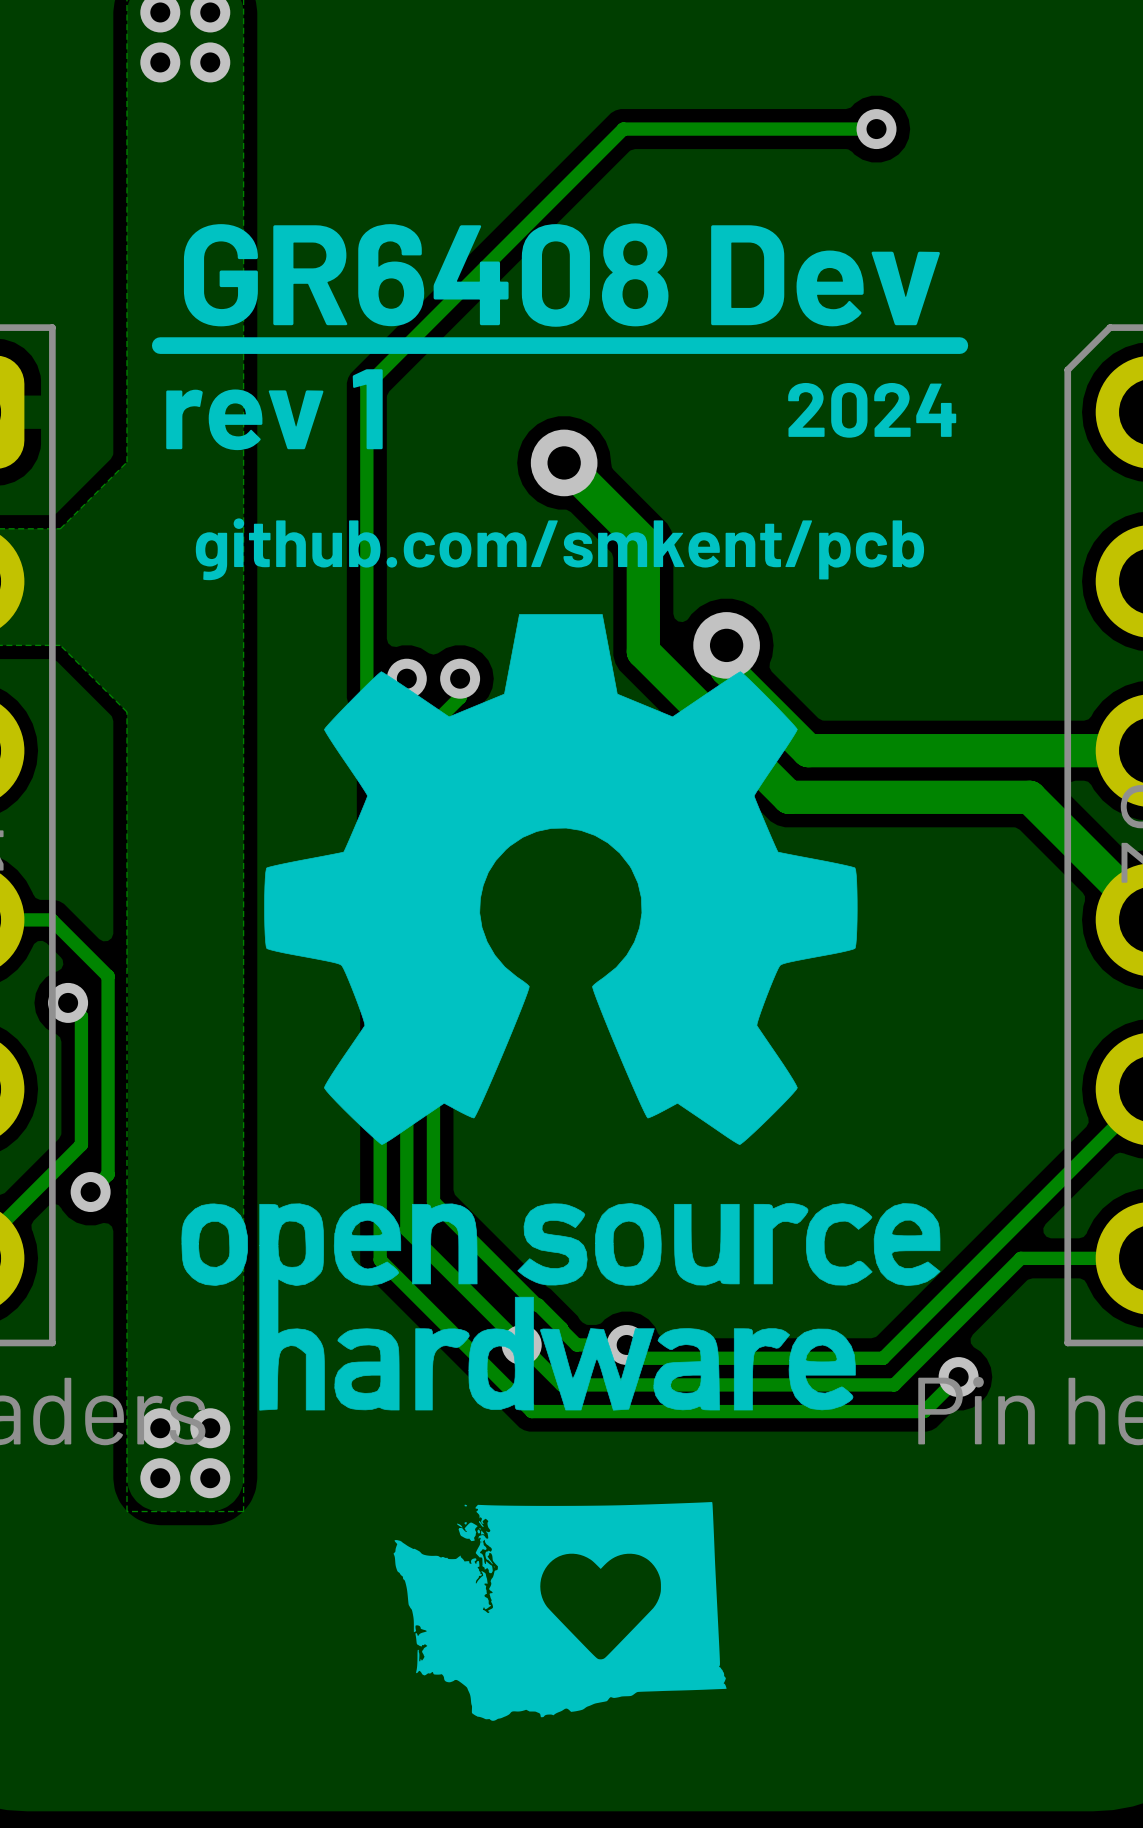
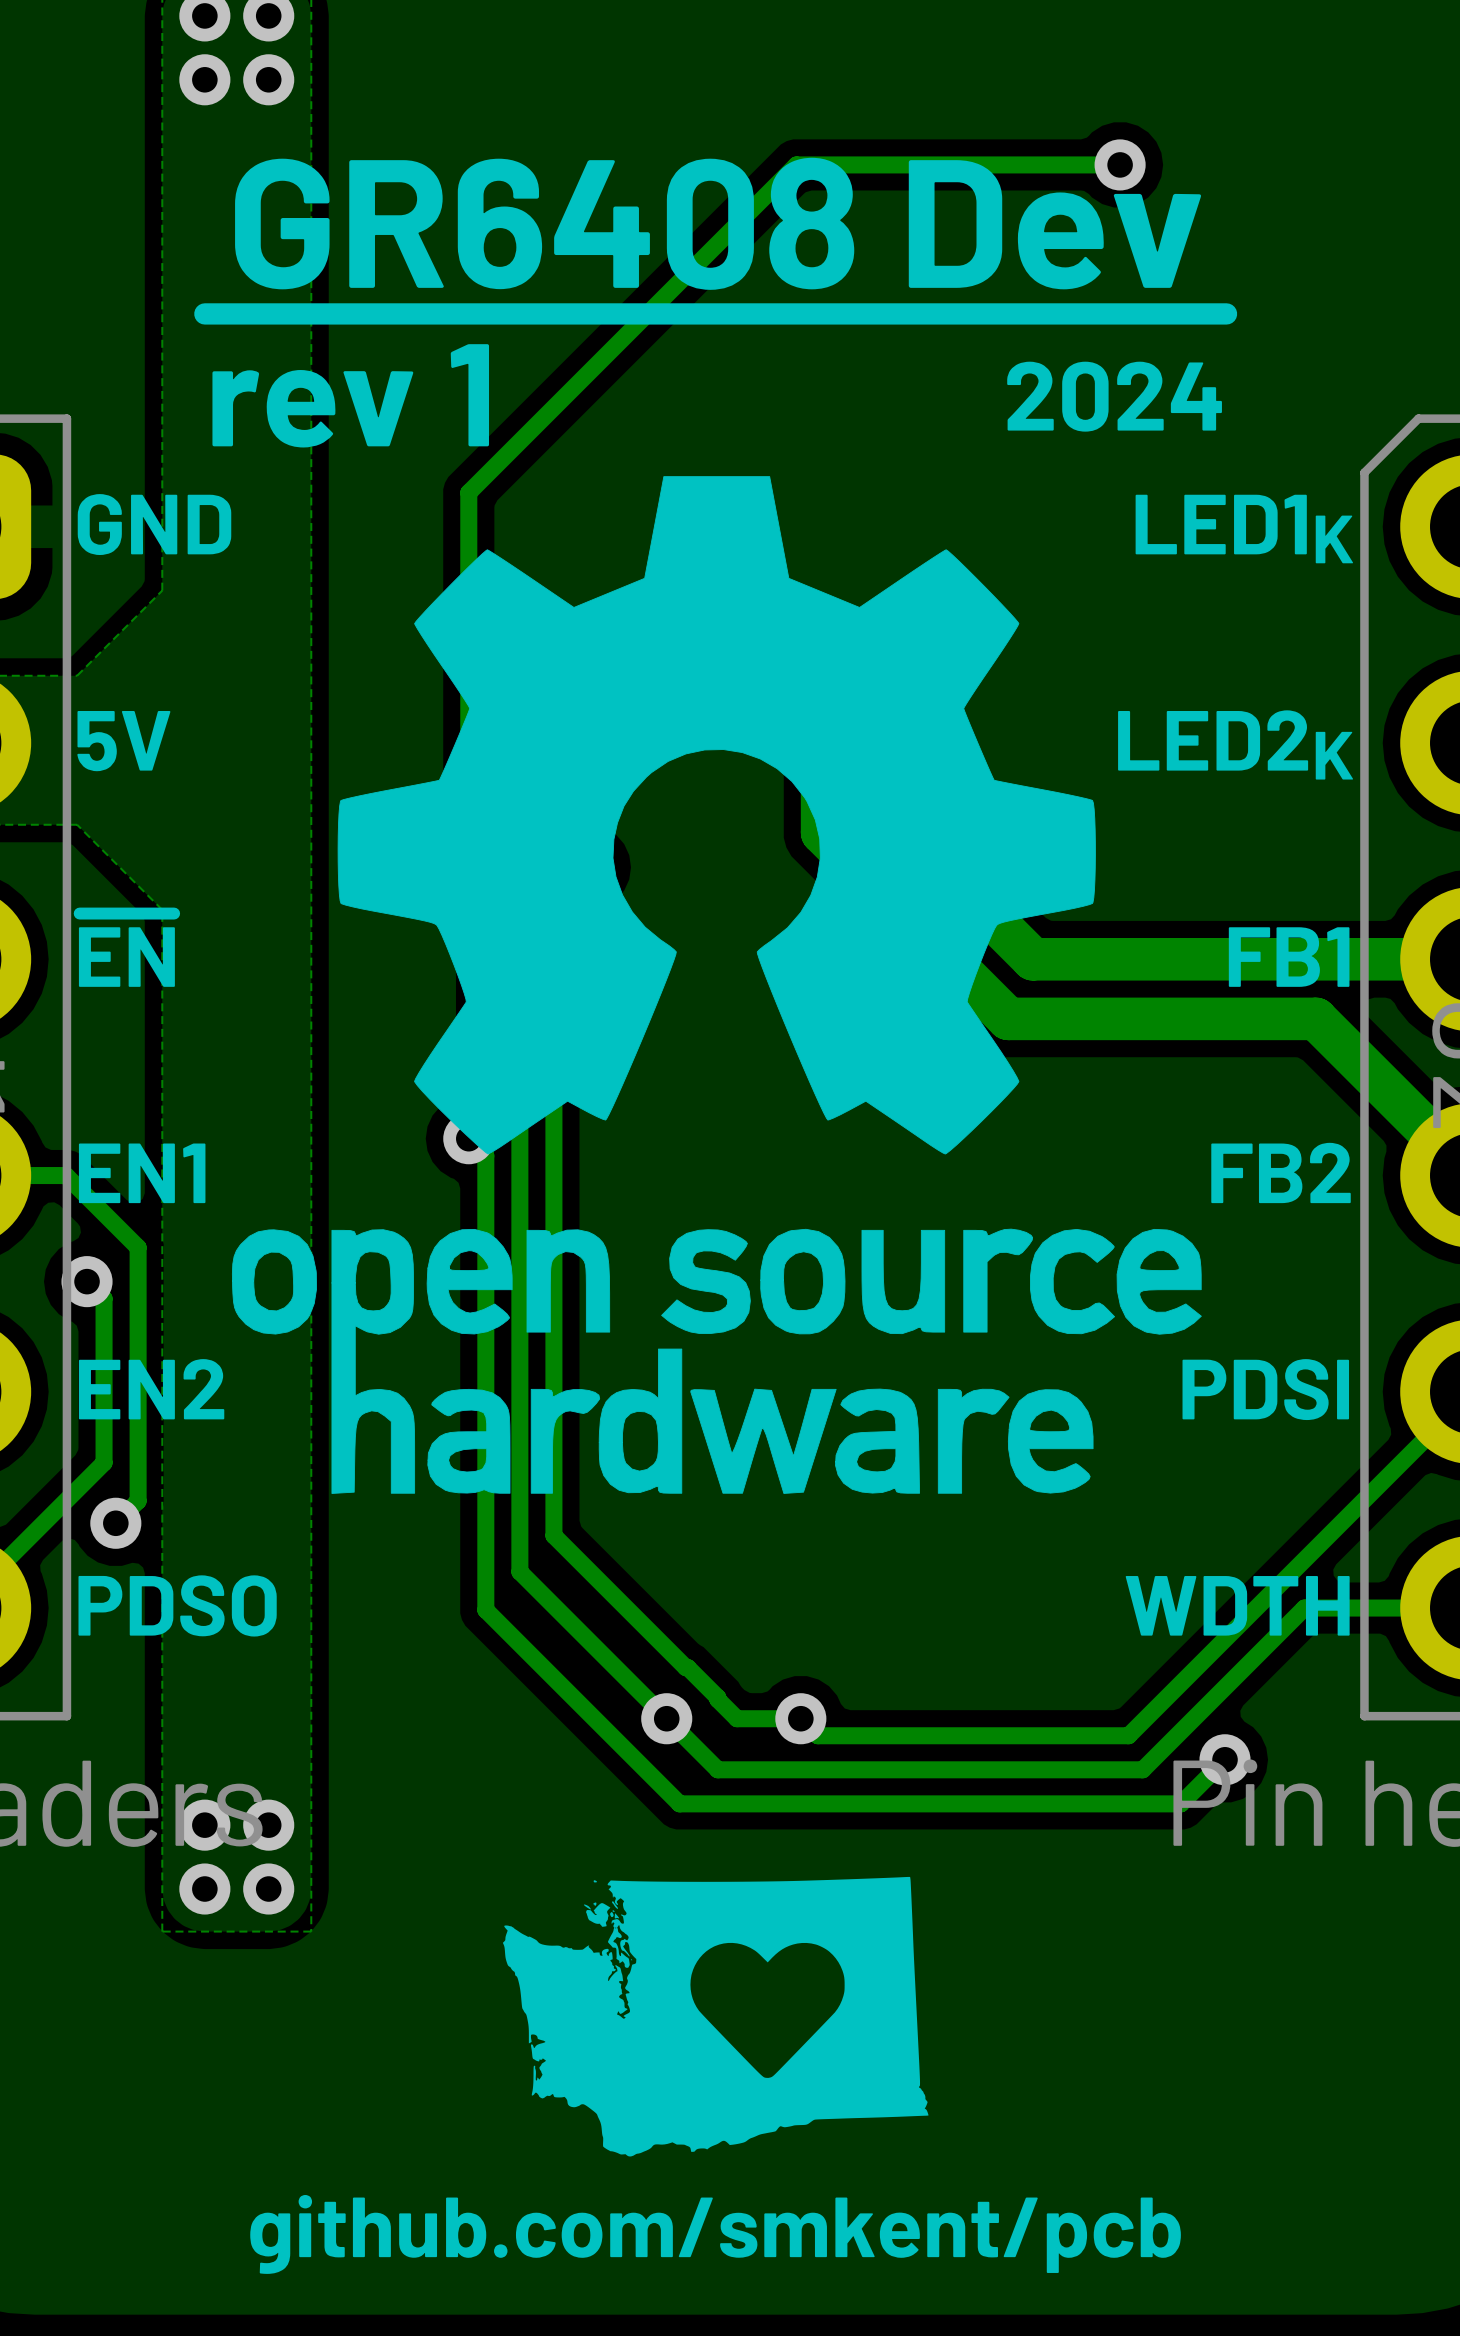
text position: GR6408 Dev (561, 275) -> GR6408 Dev (718, 223)
line: (959, 345) (160, 345) -> (1226, 313) (204, 313)
text position: rev 1 (274, 409) -> rev 1 (350, 395)
text: none -> GND (154, 524)
text position: 2024 (872, 410) -> 2024 (1114, 396)
text: none -> LED1K (1244, 529)
text position: github.com/smkent/pcb (559, 549) -> github.com/smkent/pcb (715, 2234)
text: none -> 5V (123, 741)
text: none -> LED2K (1235, 744)
text: none -> ~{EN} (126, 950)
text: none -> FB1 (1289, 957)
text: none -> FB2 (1281, 1172)
text: none -> EN1 (142, 1173)
drawing position: (560, 1012) -> (716, 985)
text: none -> EN2 (151, 1389)
text: none -> PDSI (1265, 1389)
text: none -> PDSO (177, 1605)
text: none -> WDTH (1237, 1605)
drawing position: (560, 1611) -> (715, 2016)

